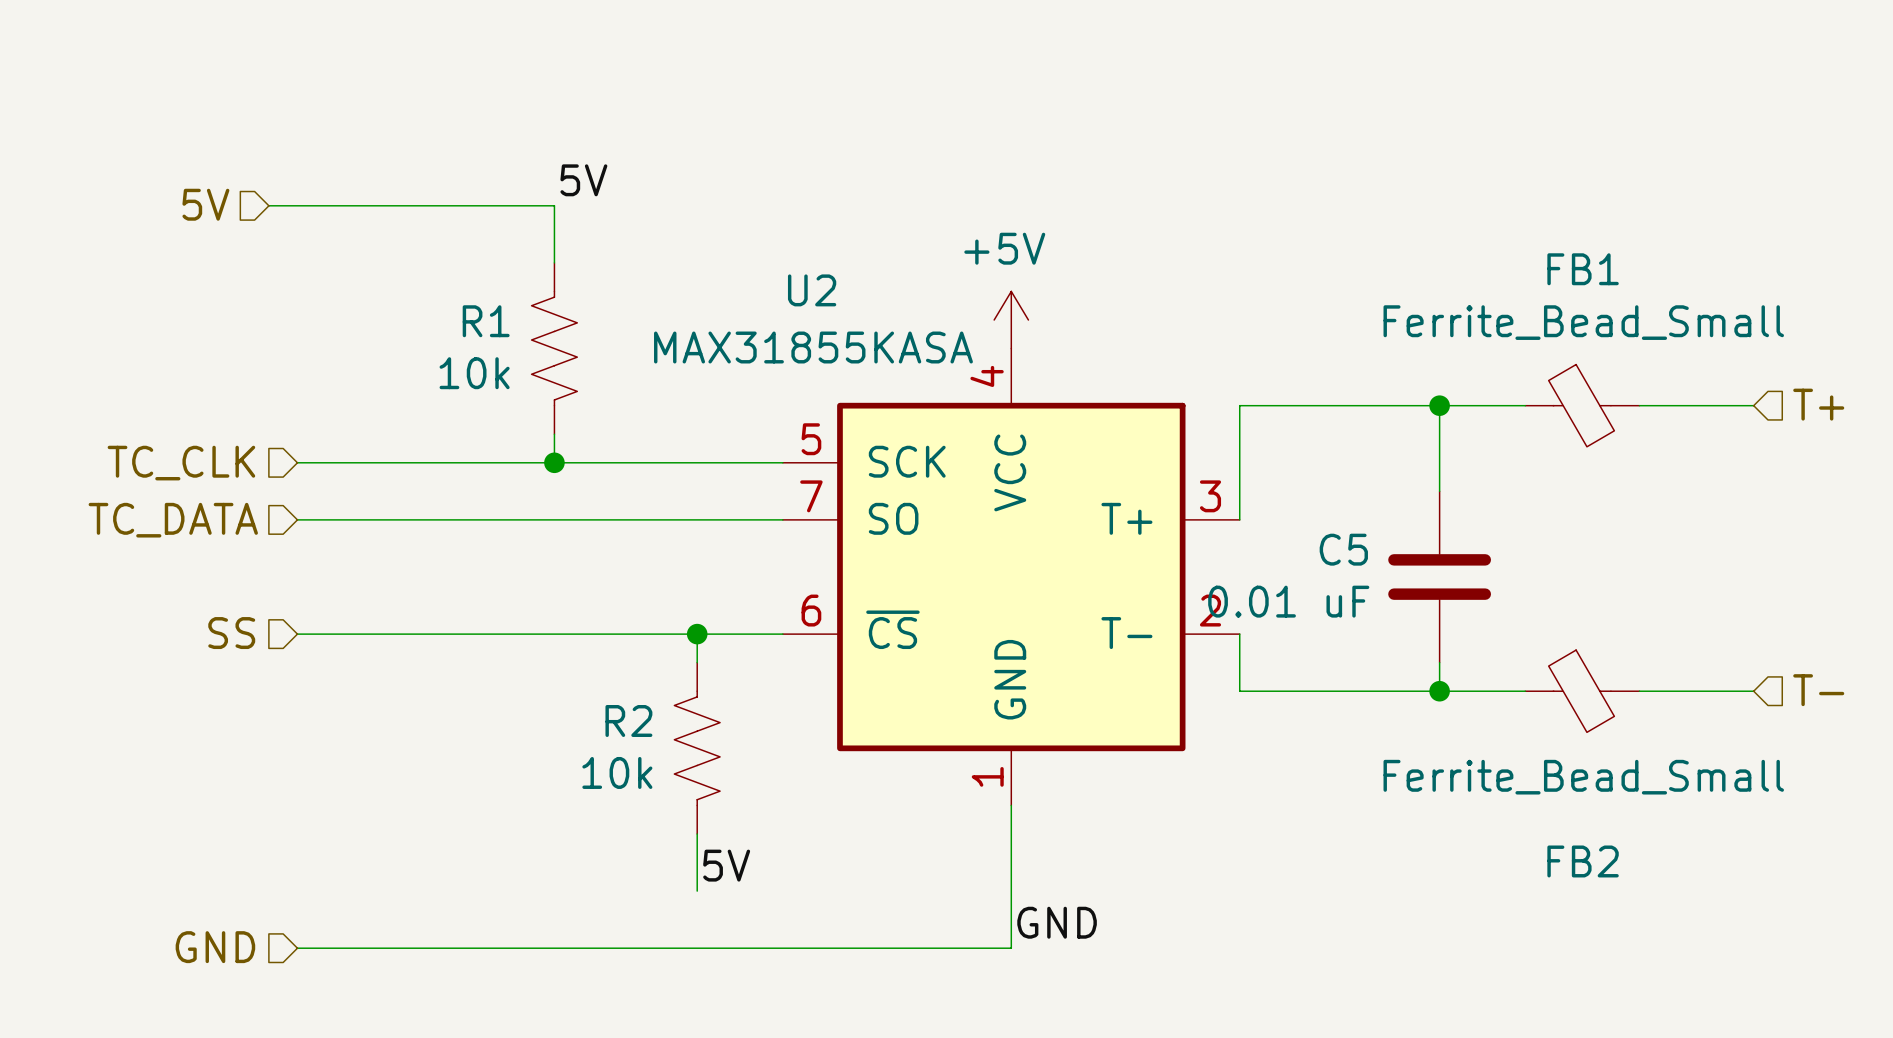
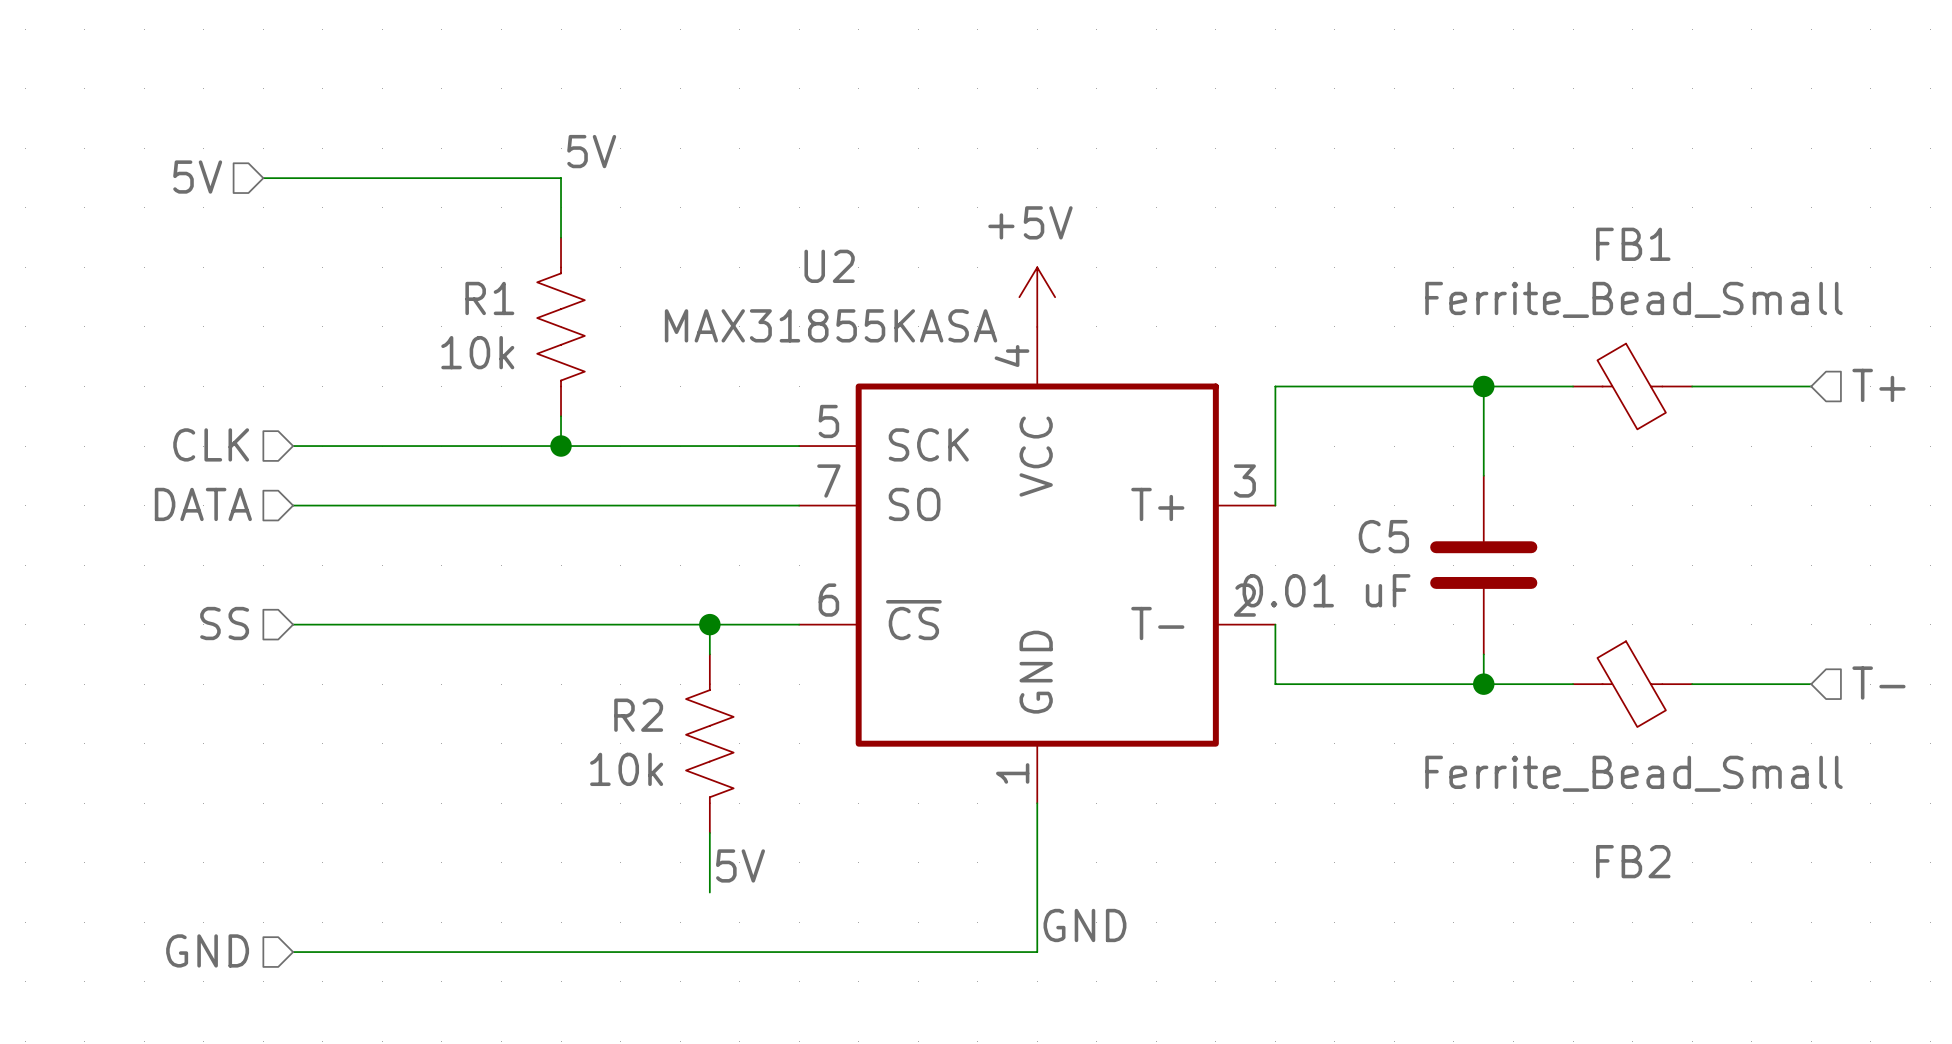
hierarchical label: TC_CLK (181, 463) -> CLK (211, 444)
hierarchical label: TC_DATA (173, 520) -> DATA (203, 504)

